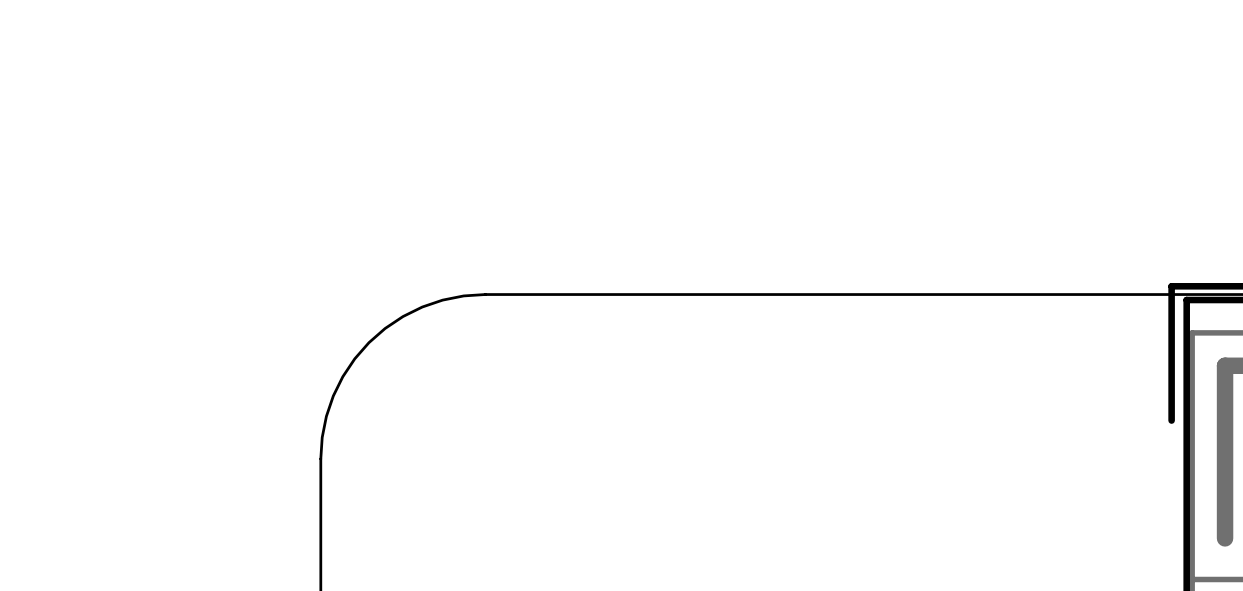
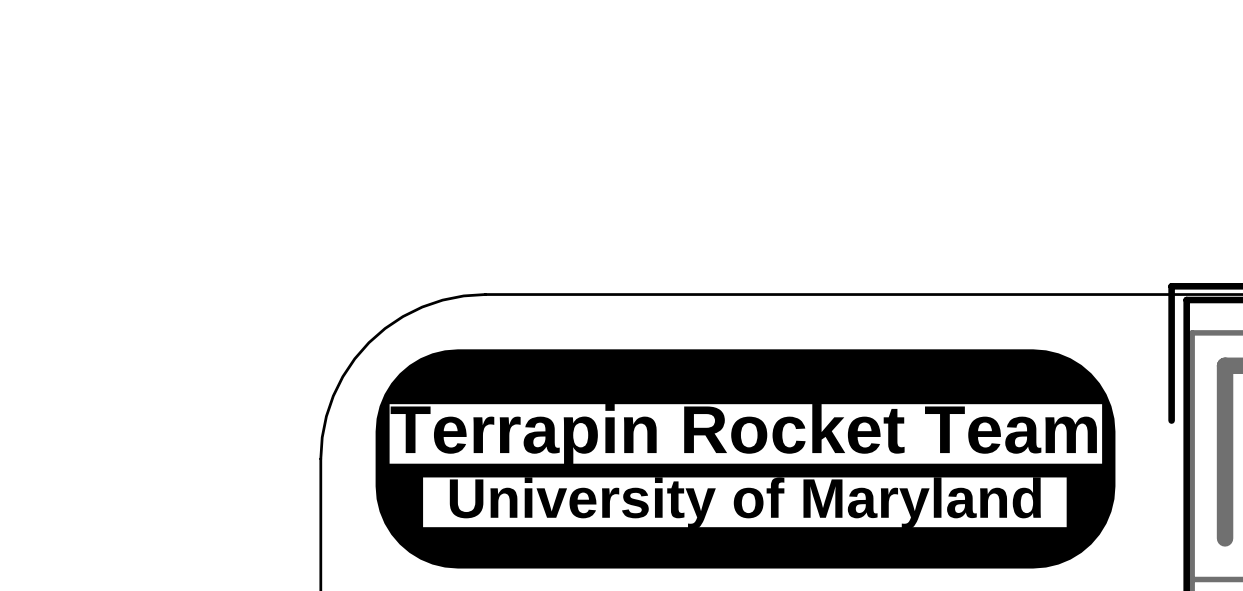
drawing: none -> [375, 349, 1116, 569]
text: none -> Terrapin Rocket Team (743, 435)
text: none -> University of Maryland (745, 503)

